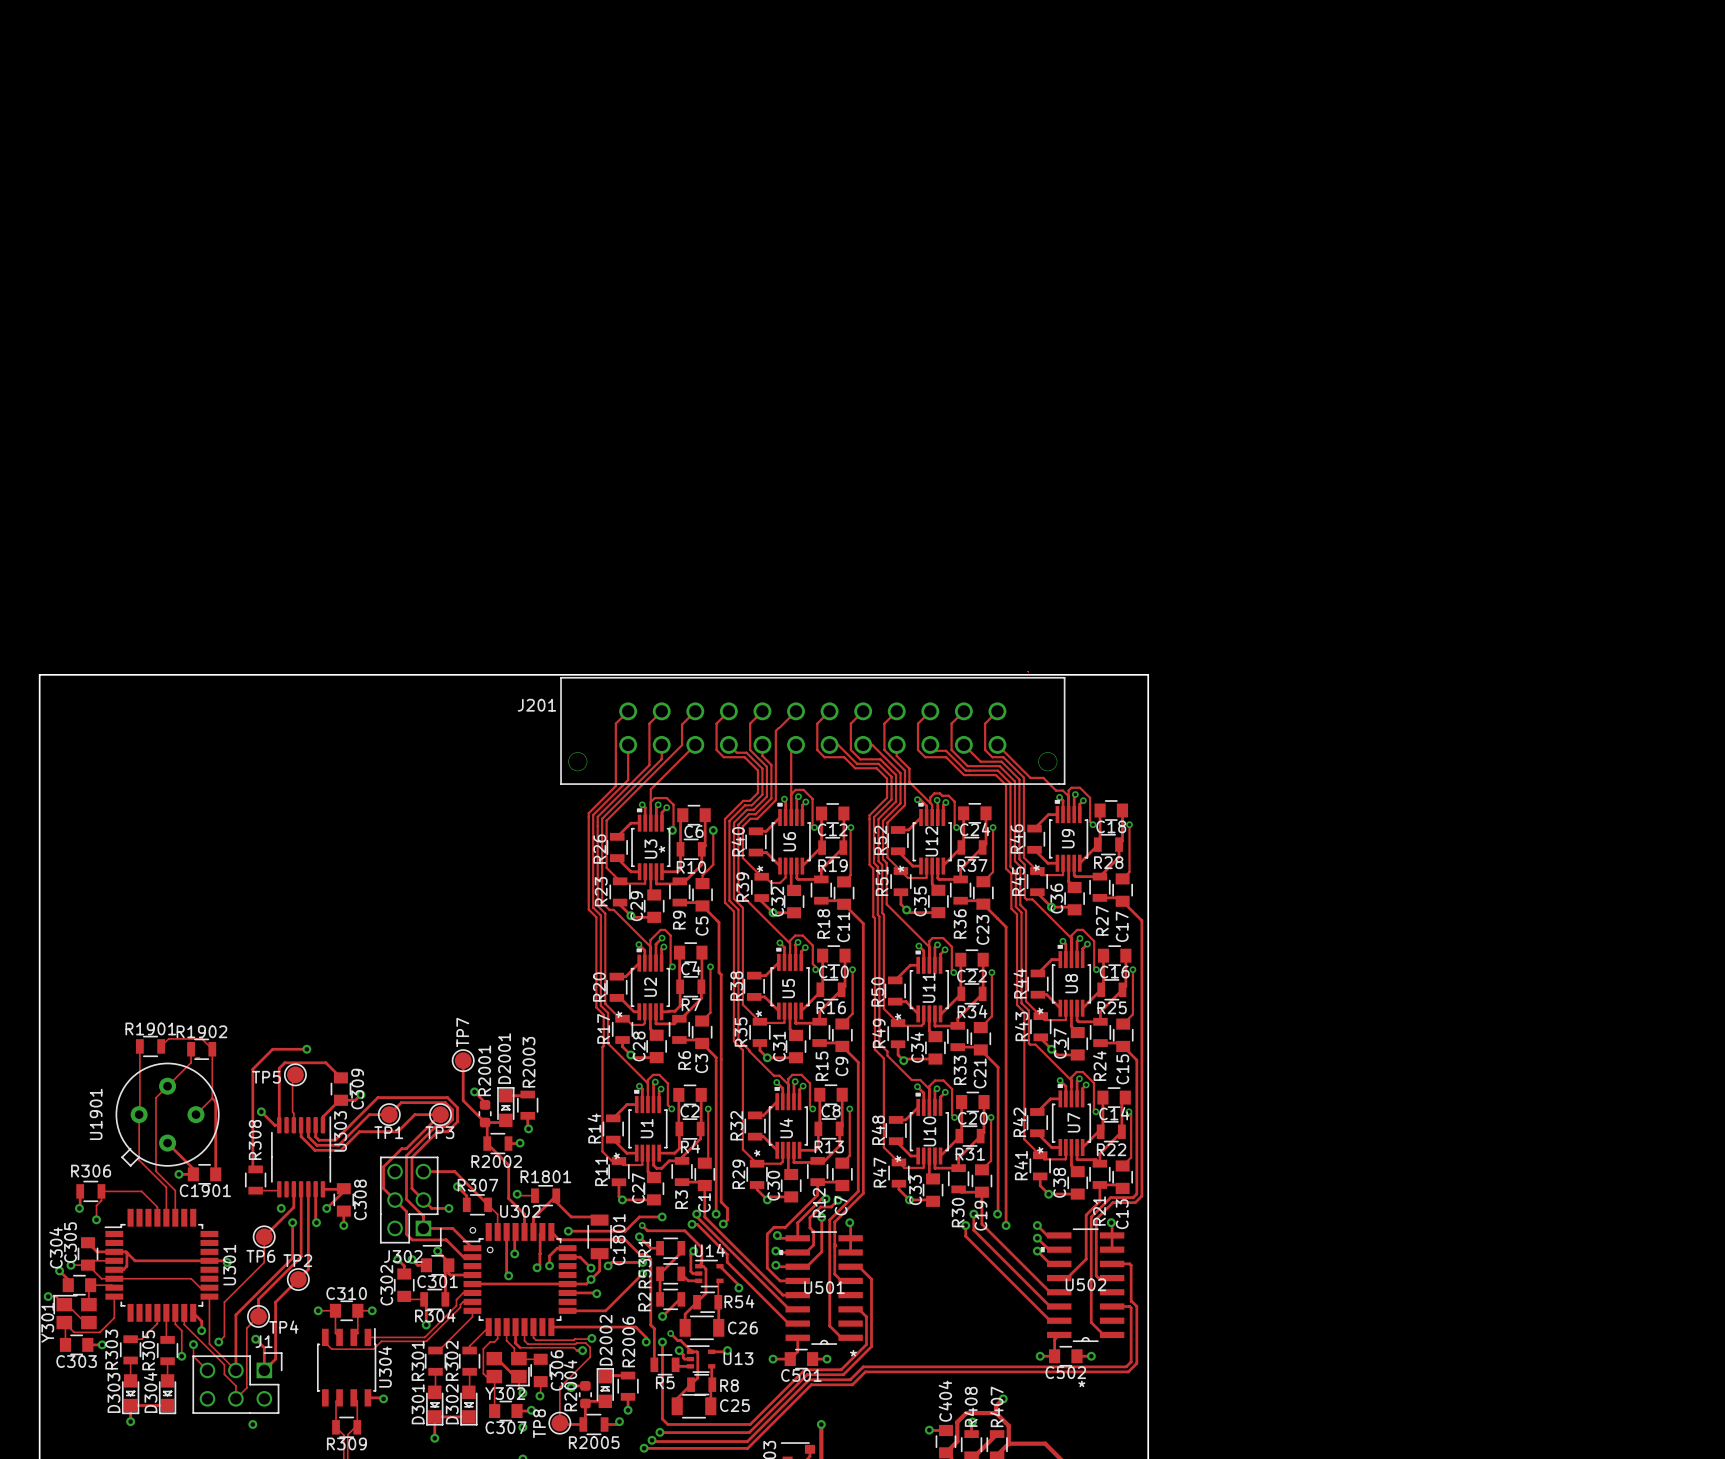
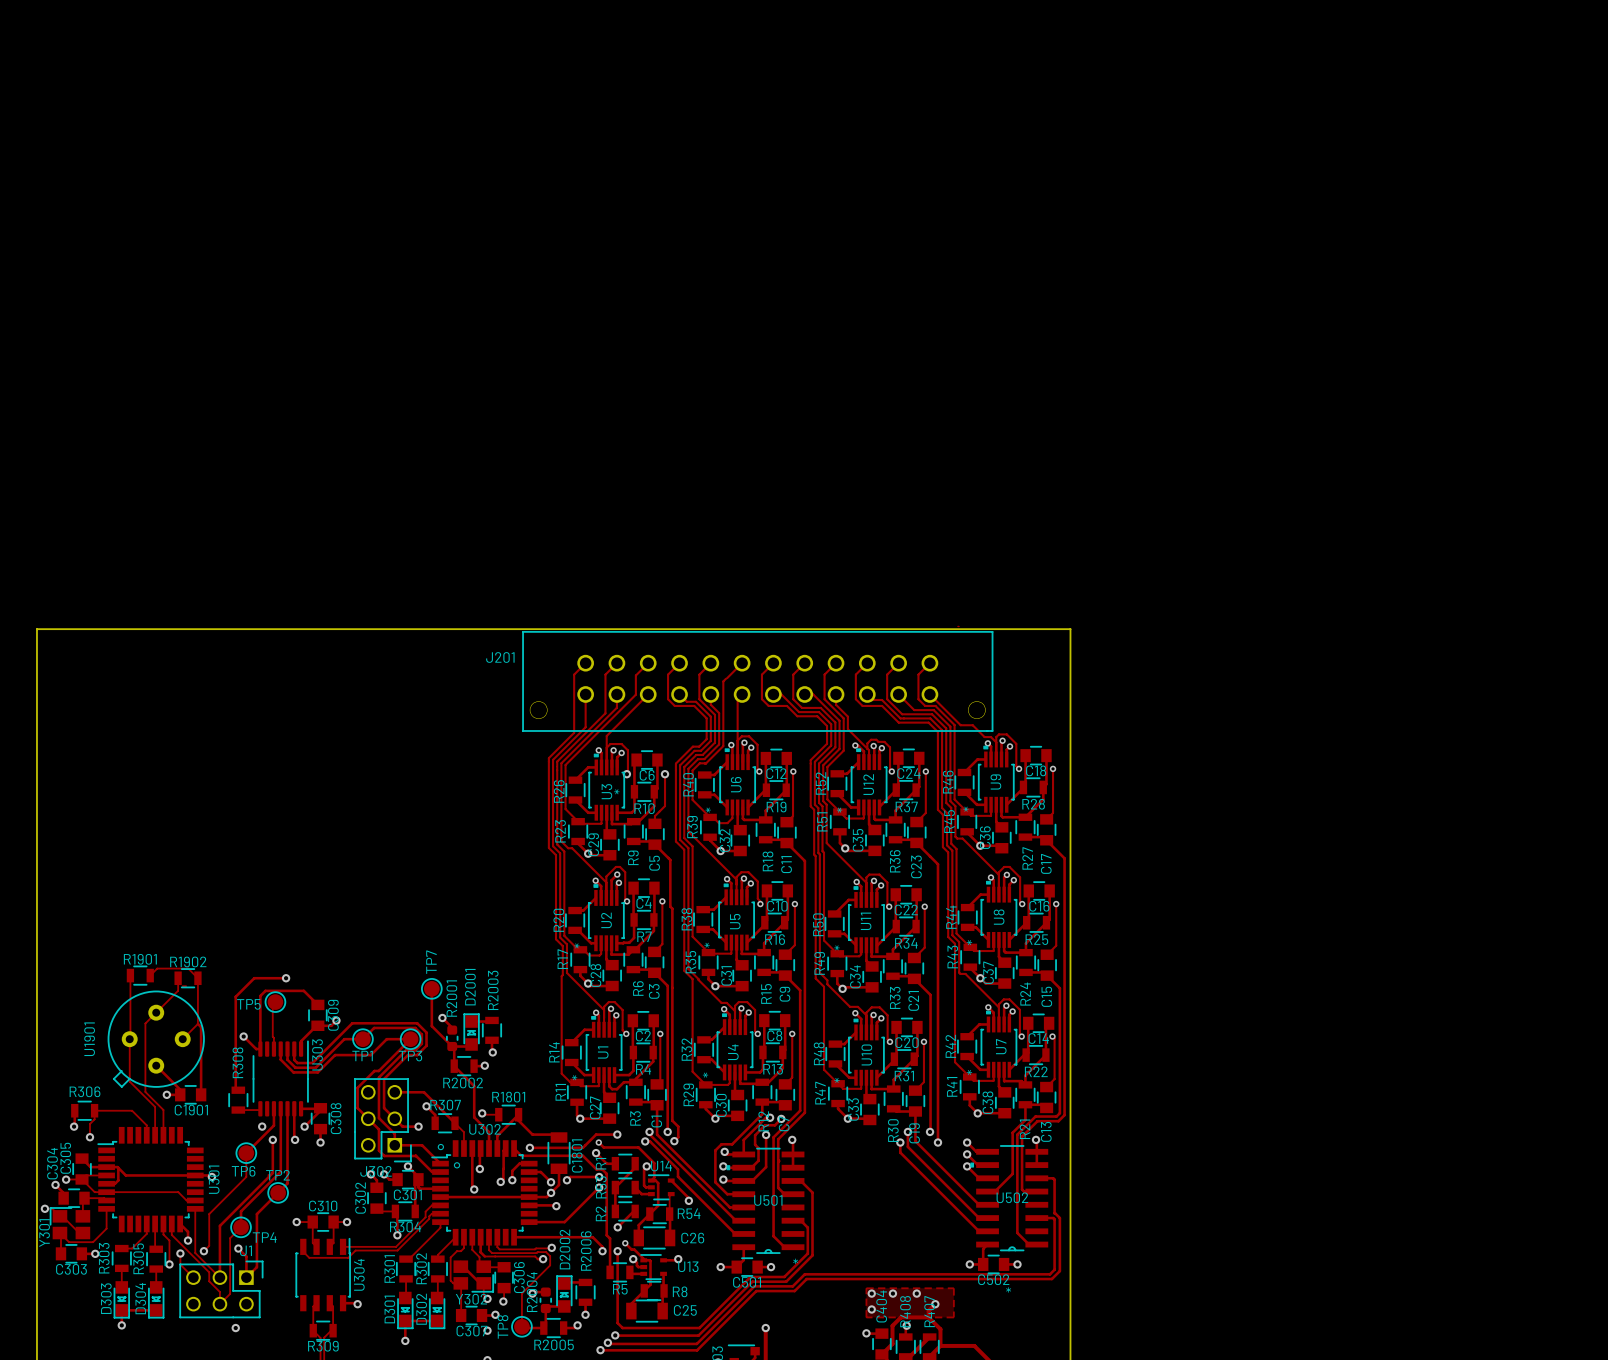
zone outline: none -> (866, 1288) (866, 1317) (953, 1317) (953, 1288) (866, 1288)
via: none -> (871, 1293)
via: none -> (892, 1293)
via: none -> (916, 1293)
via: none -> (871, 1309)

